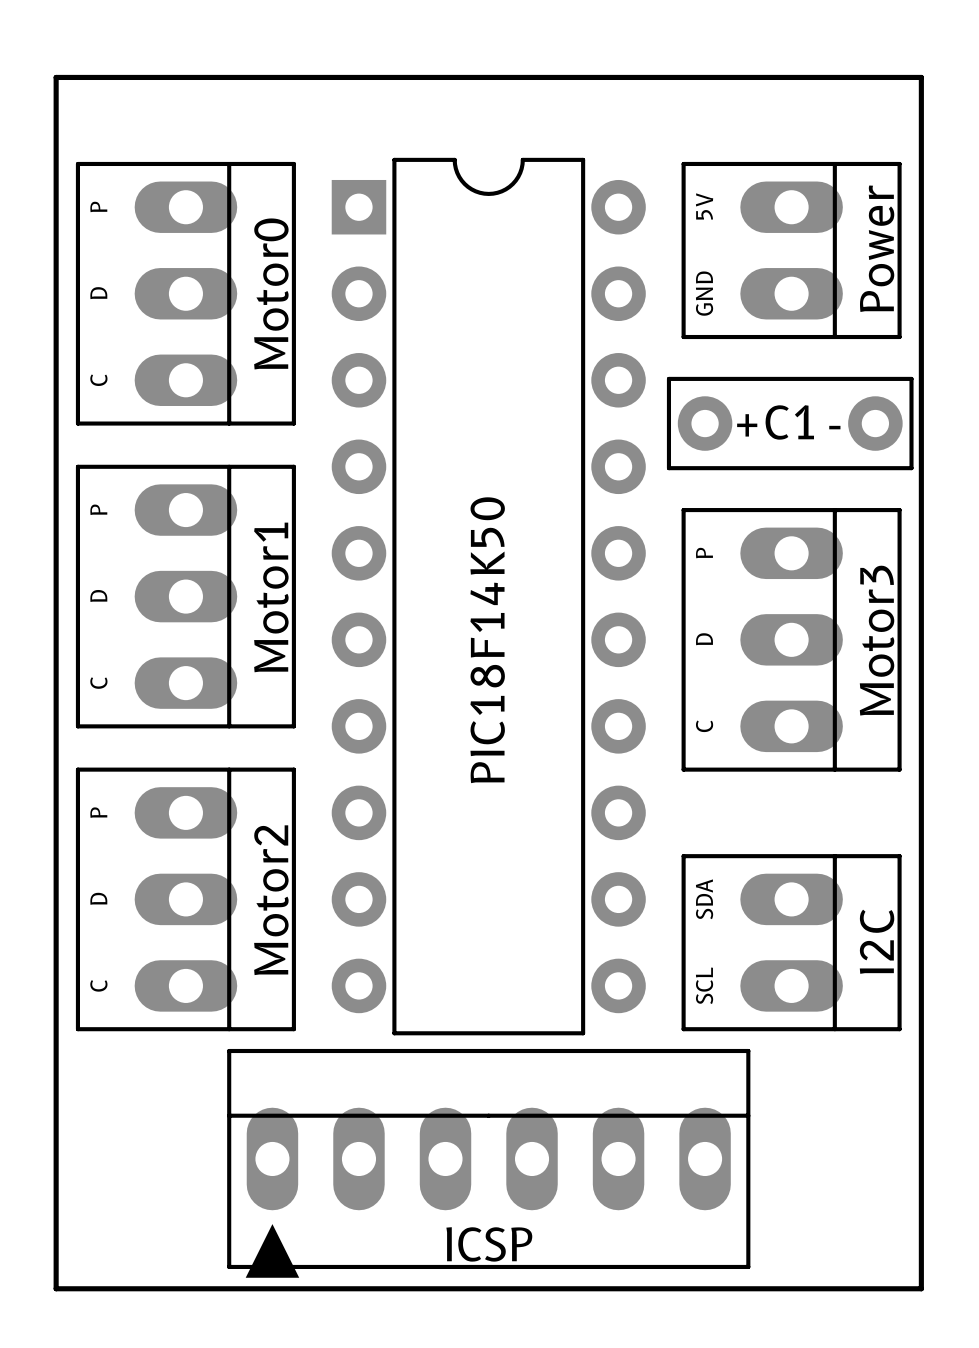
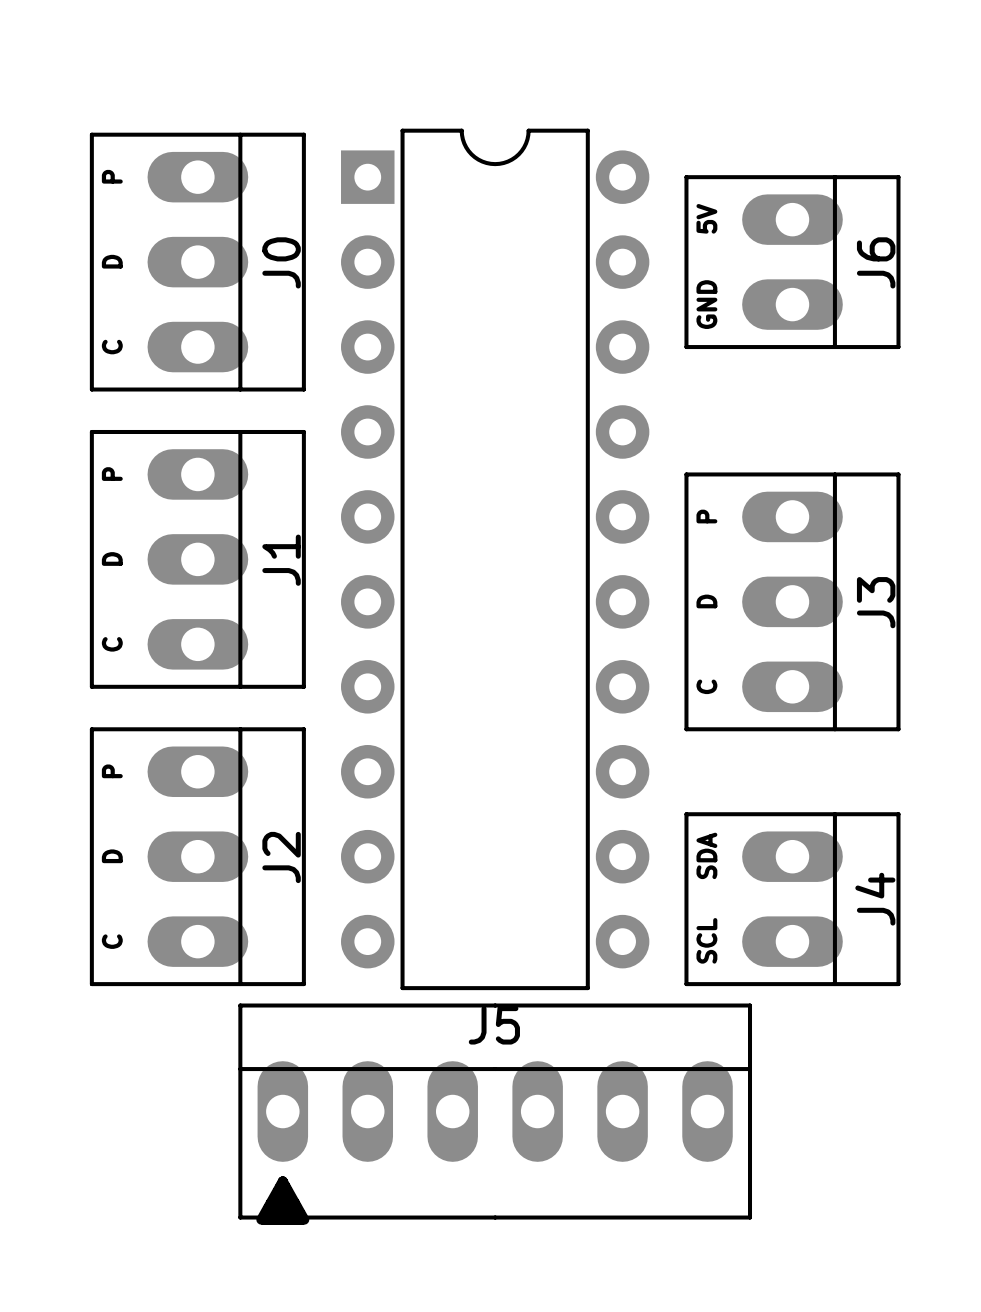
board edge: (56, 77) (921, 77) (921, 1288) (56, 1288) (56, 77) -> none
text position: 5V (704, 206) -> 5V (706, 218)
Power: (791, 250) -> none
Motor0 name: Motor0 (271, 293) -> J0 (281, 262)
text position: GND (704, 293) -> GND (706, 304)
J6: none -> (792, 262)
C1: (790, 423) -> none
text: + (747, 425) -> none
text: - (834, 427) -> none
Motor1 name: Motor1 (271, 597) -> J1 (281, 560)
PIC18F14K50 name: PIC18F14K50 (487, 640) -> none
Motor3 name: Motor3 (877, 640) -> J3 (876, 602)
Motor2 name: Motor2 (271, 900) -> J2 (281, 857)
I2C name: I2C (877, 941) -> J4 (875, 899)
ICSP name: ICSP (489, 1244) -> J5 (494, 1025)

